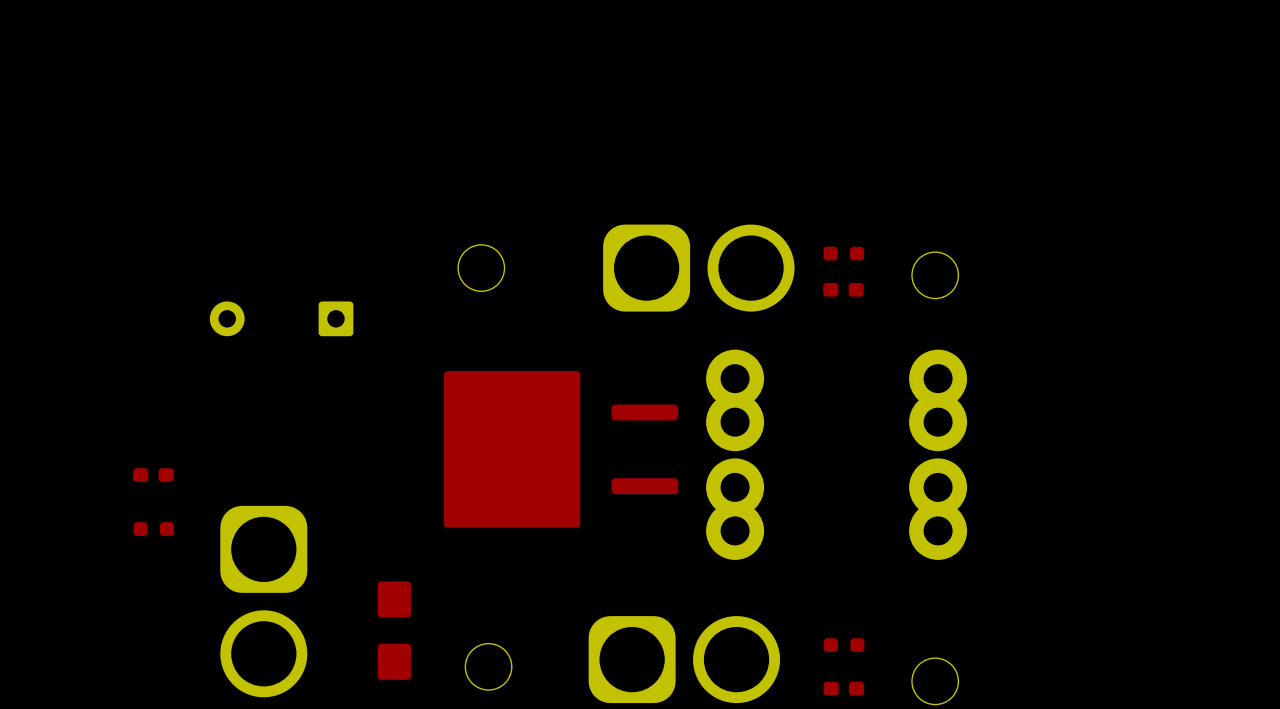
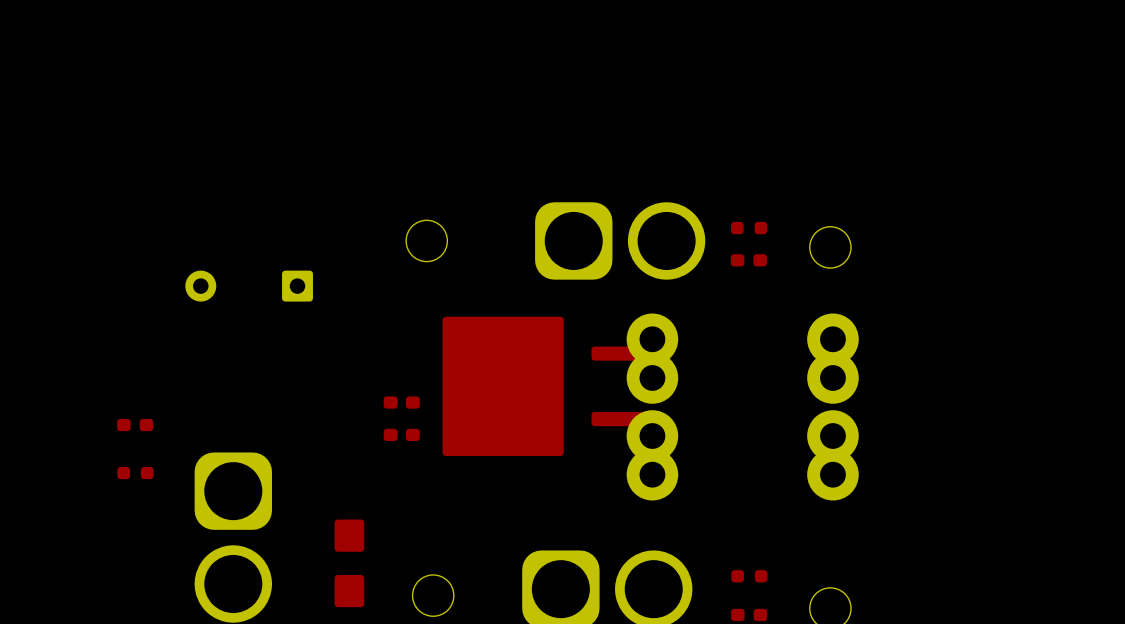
part: none -> (401, 402)
part position: (561, 449) -> (546, 386)
part: none -> (401, 434)

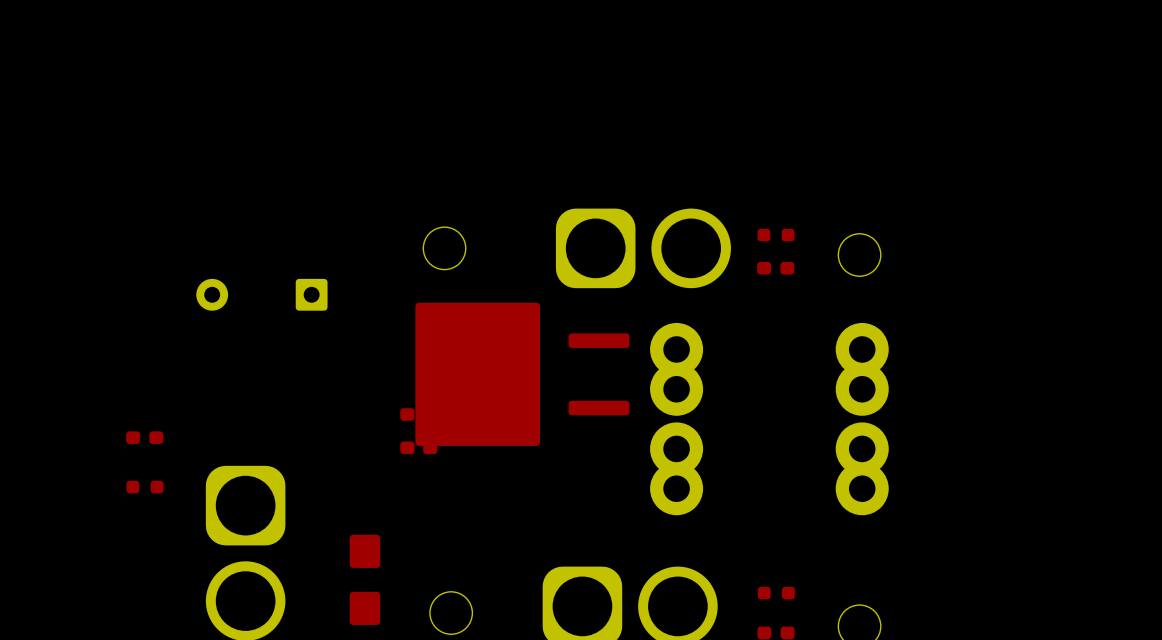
part position: (546, 386) -> (522, 374)

